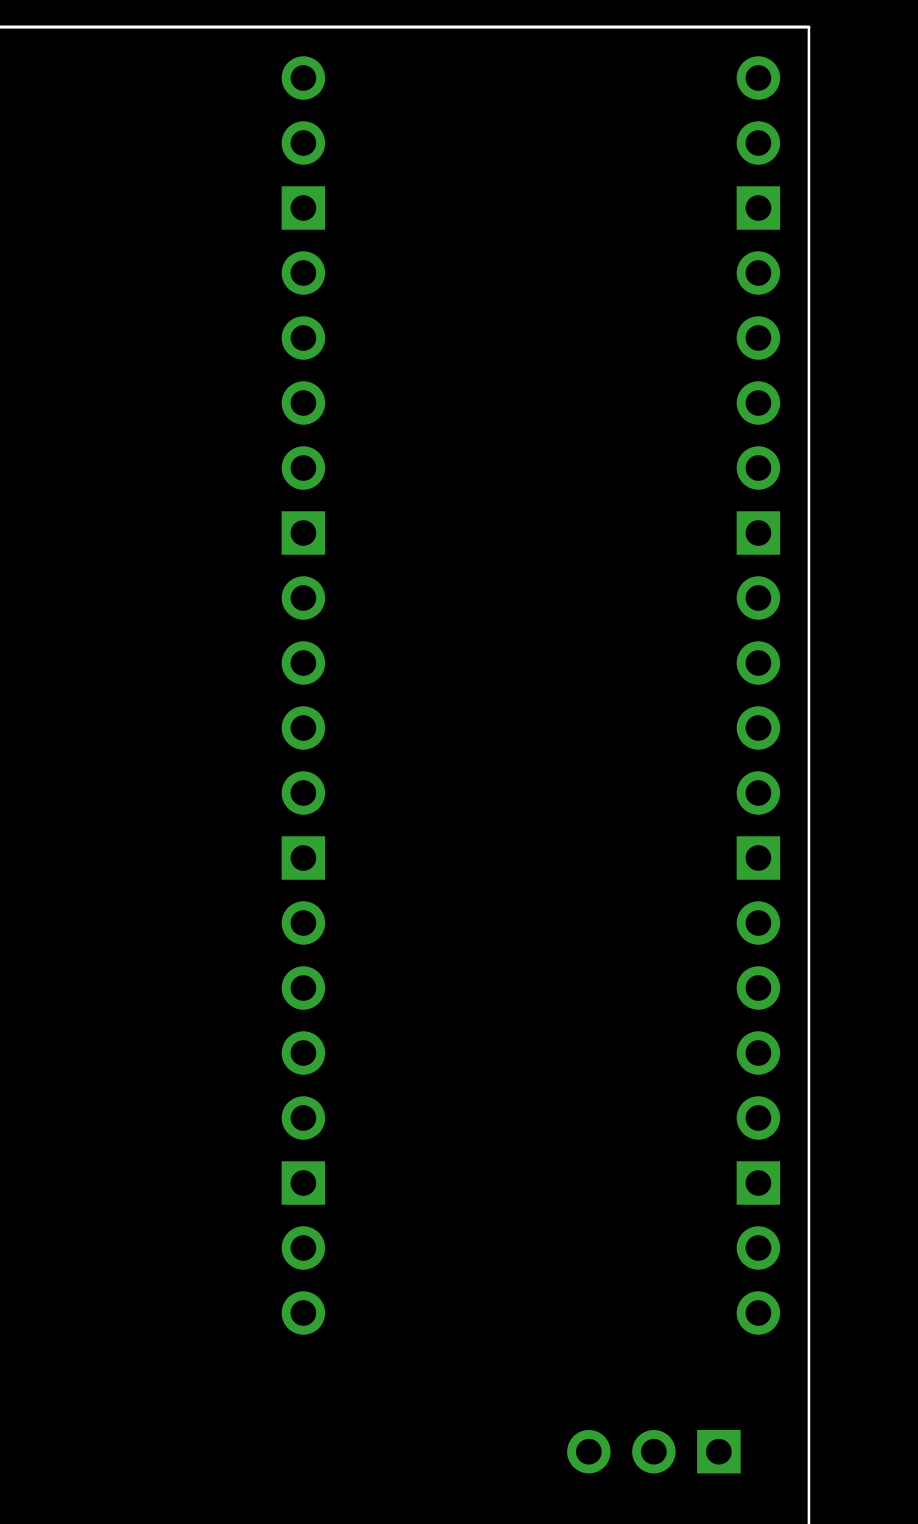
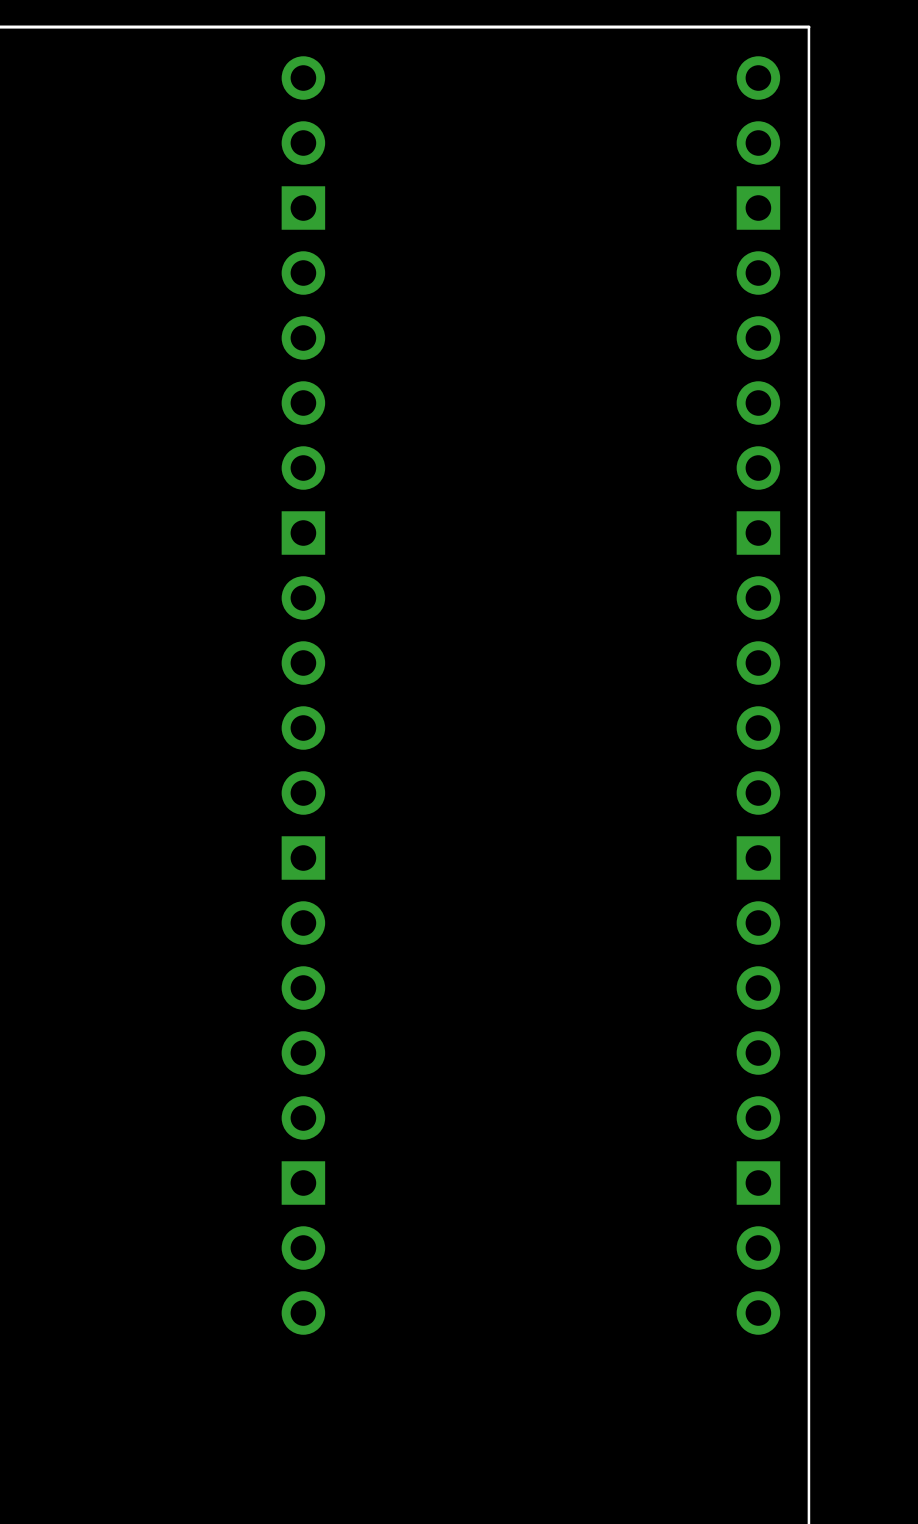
part: (653, 1451) -> none

